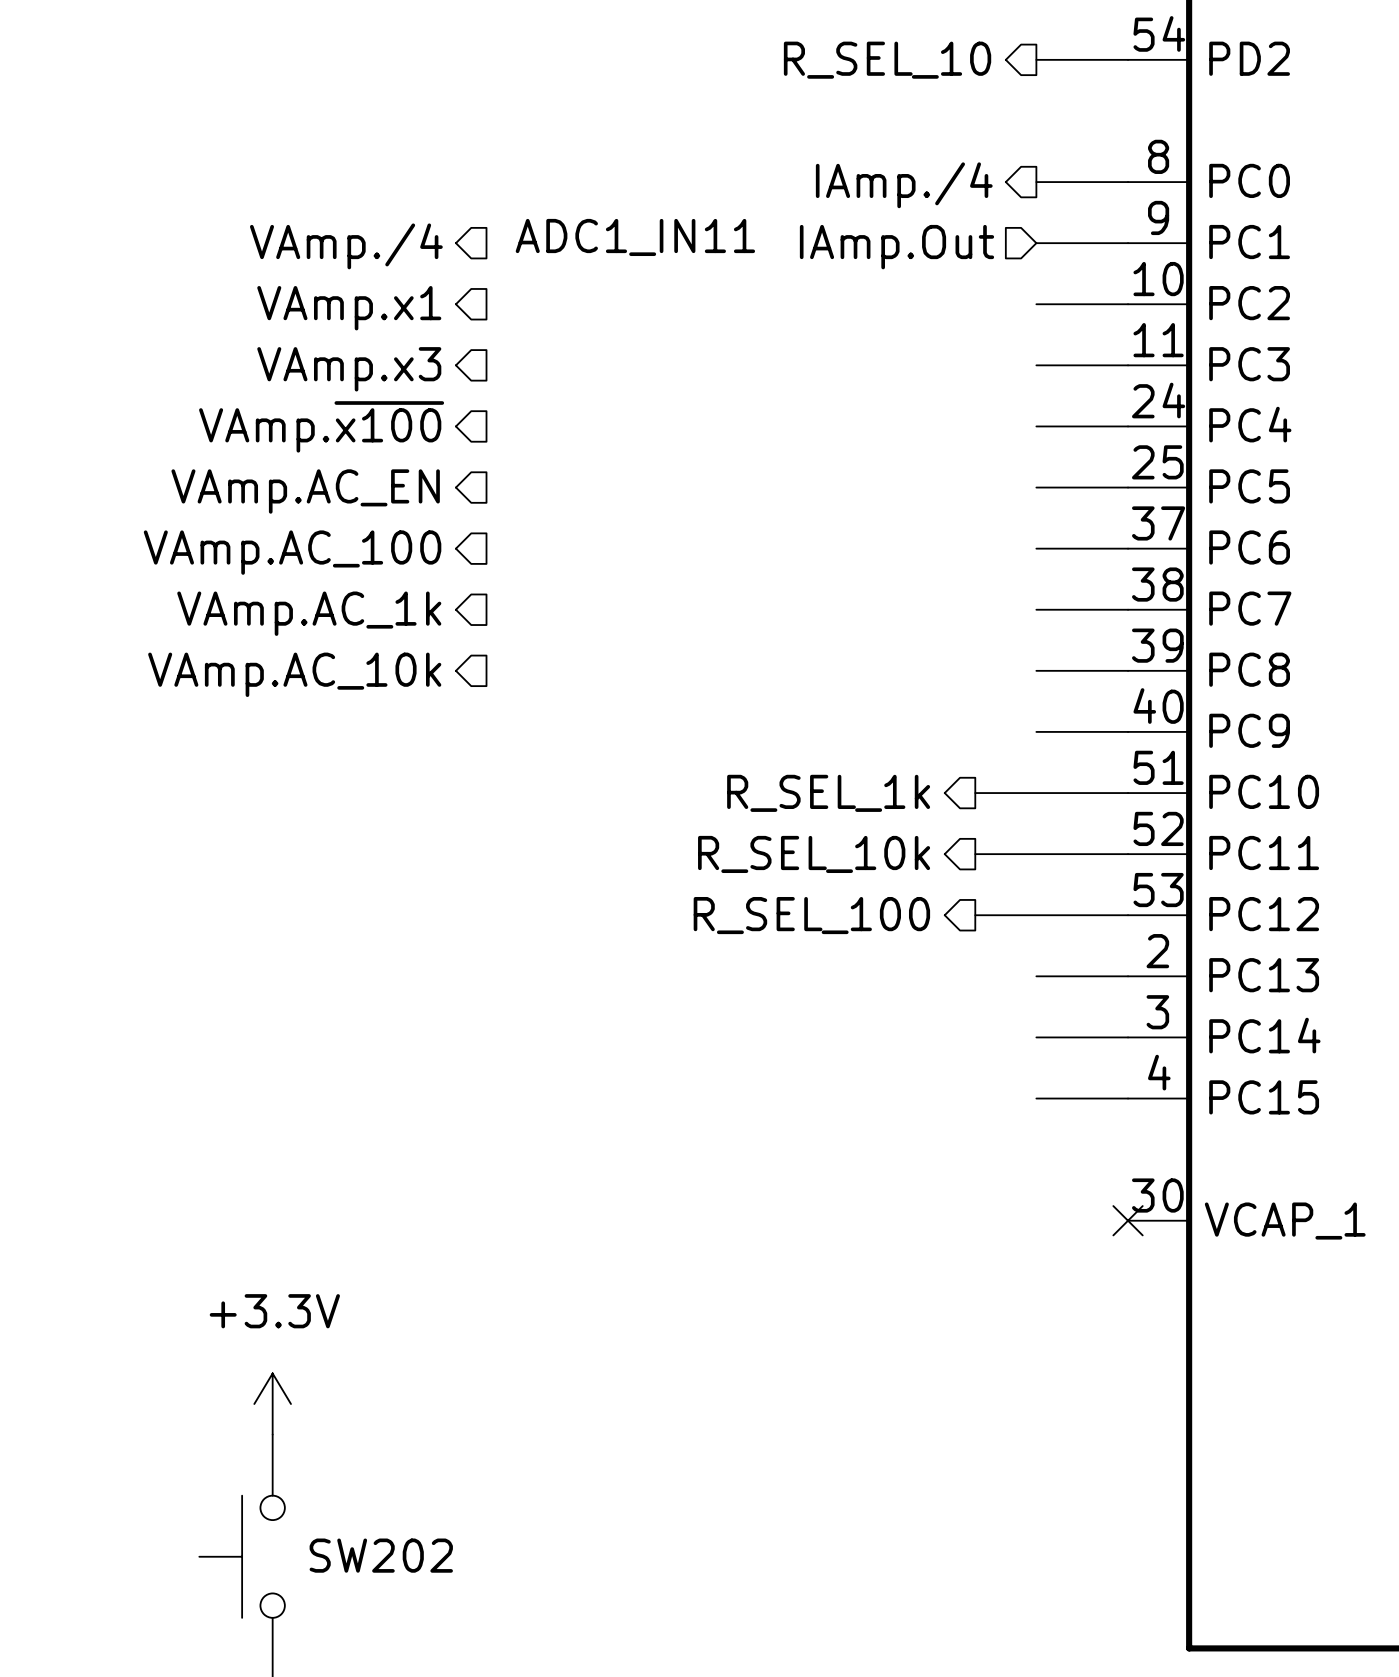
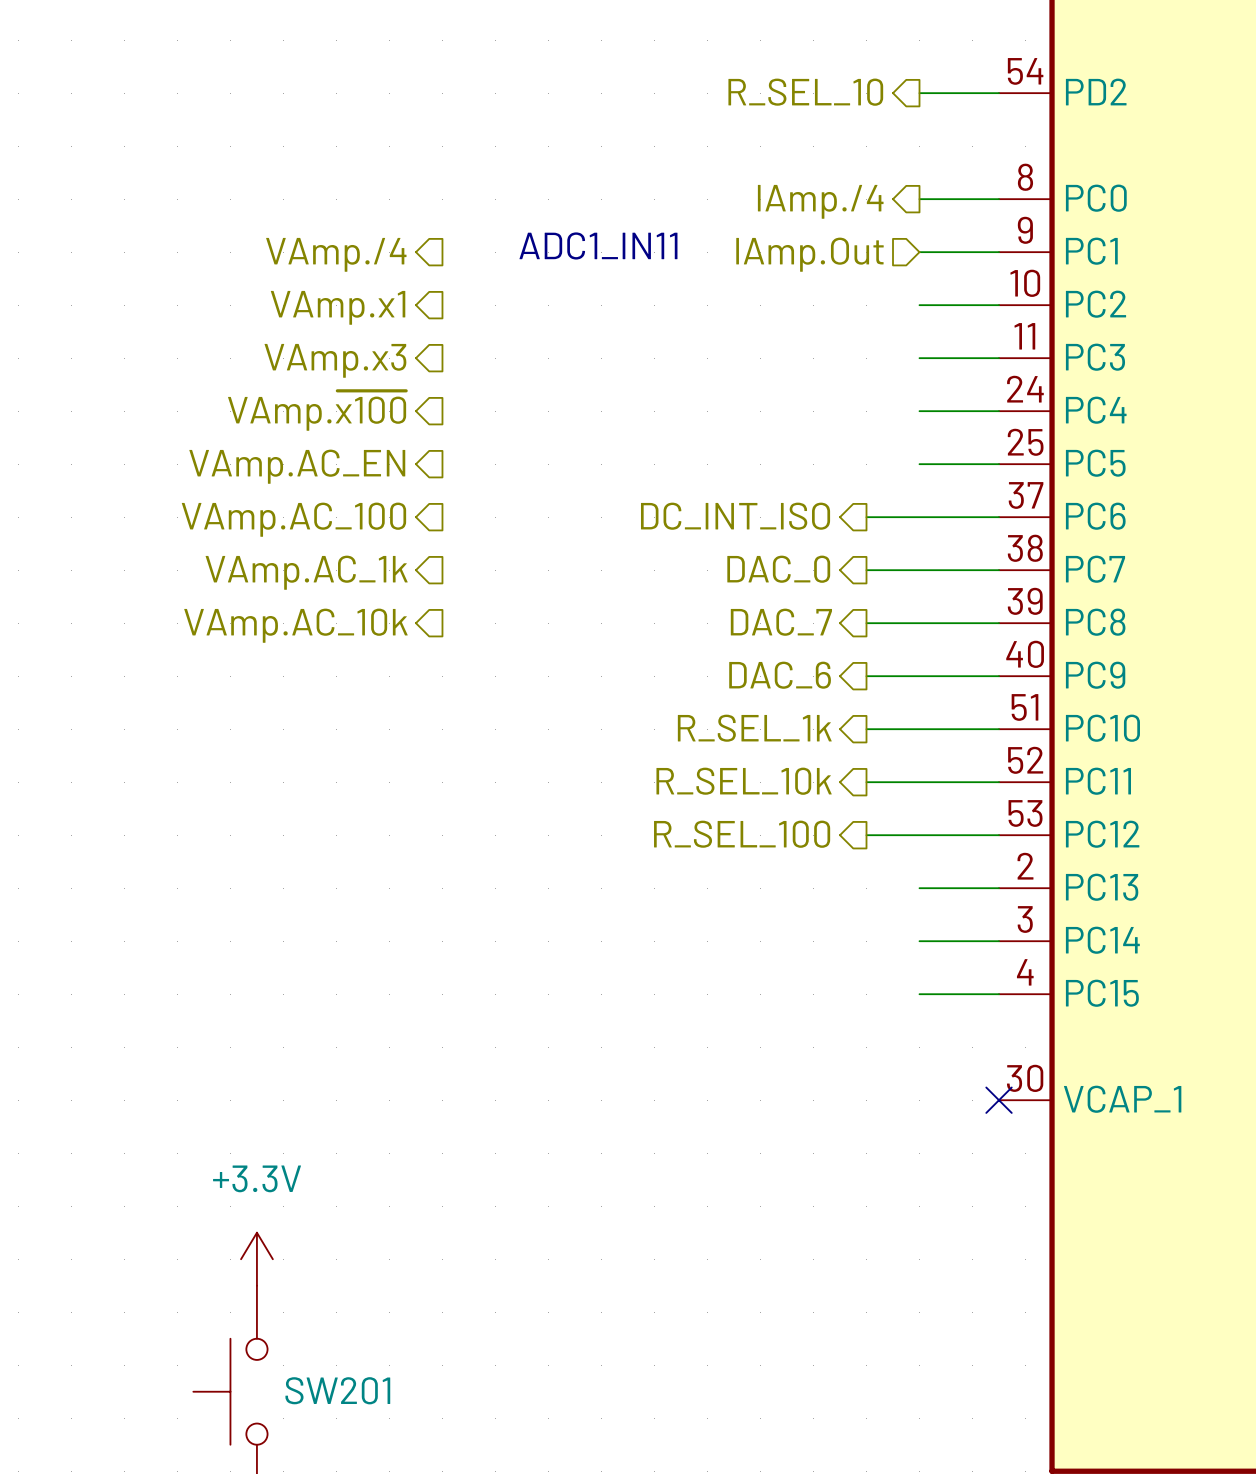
hierarchical label: none -> DC_INT_ISO (735, 516)
wire: none -> (866, 517) (919, 517)
wire: none -> (866, 570) (919, 570)
hierarchical label: none -> DAC_0 (778, 569)
wire: none -> (866, 623) (919, 623)
hierarchical label: none -> DAC_7 (781, 622)
wire: none -> (866, 676) (919, 676)
hierarchical label: none -> DAC_6 (780, 675)
SW202 name: SW202 (381, 1555) -> SW201 (337, 1390)

